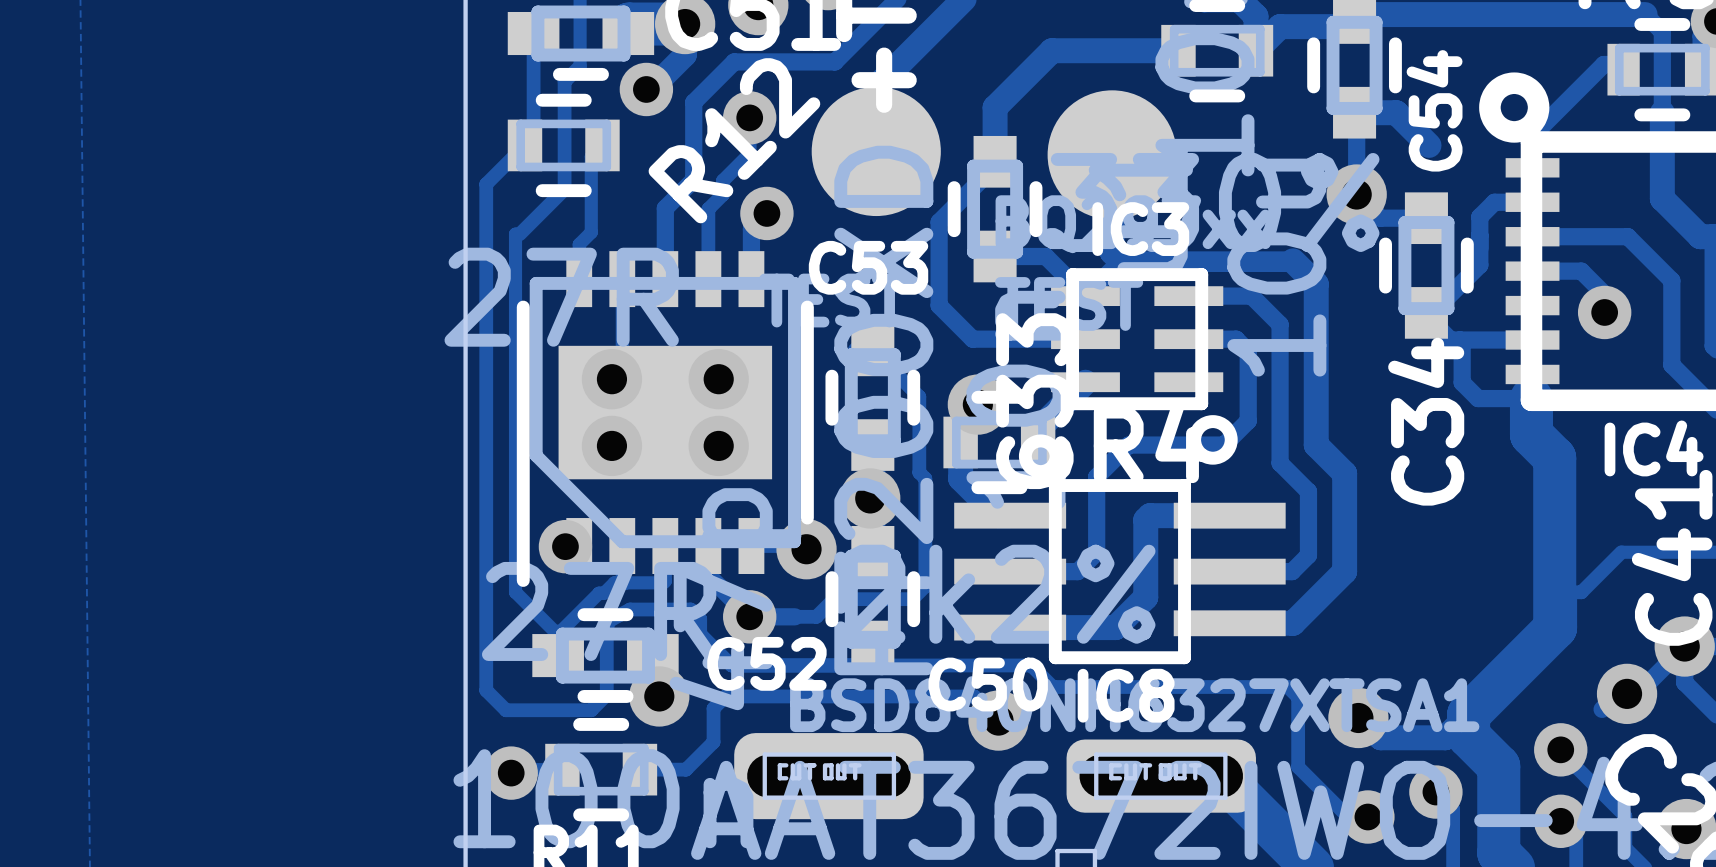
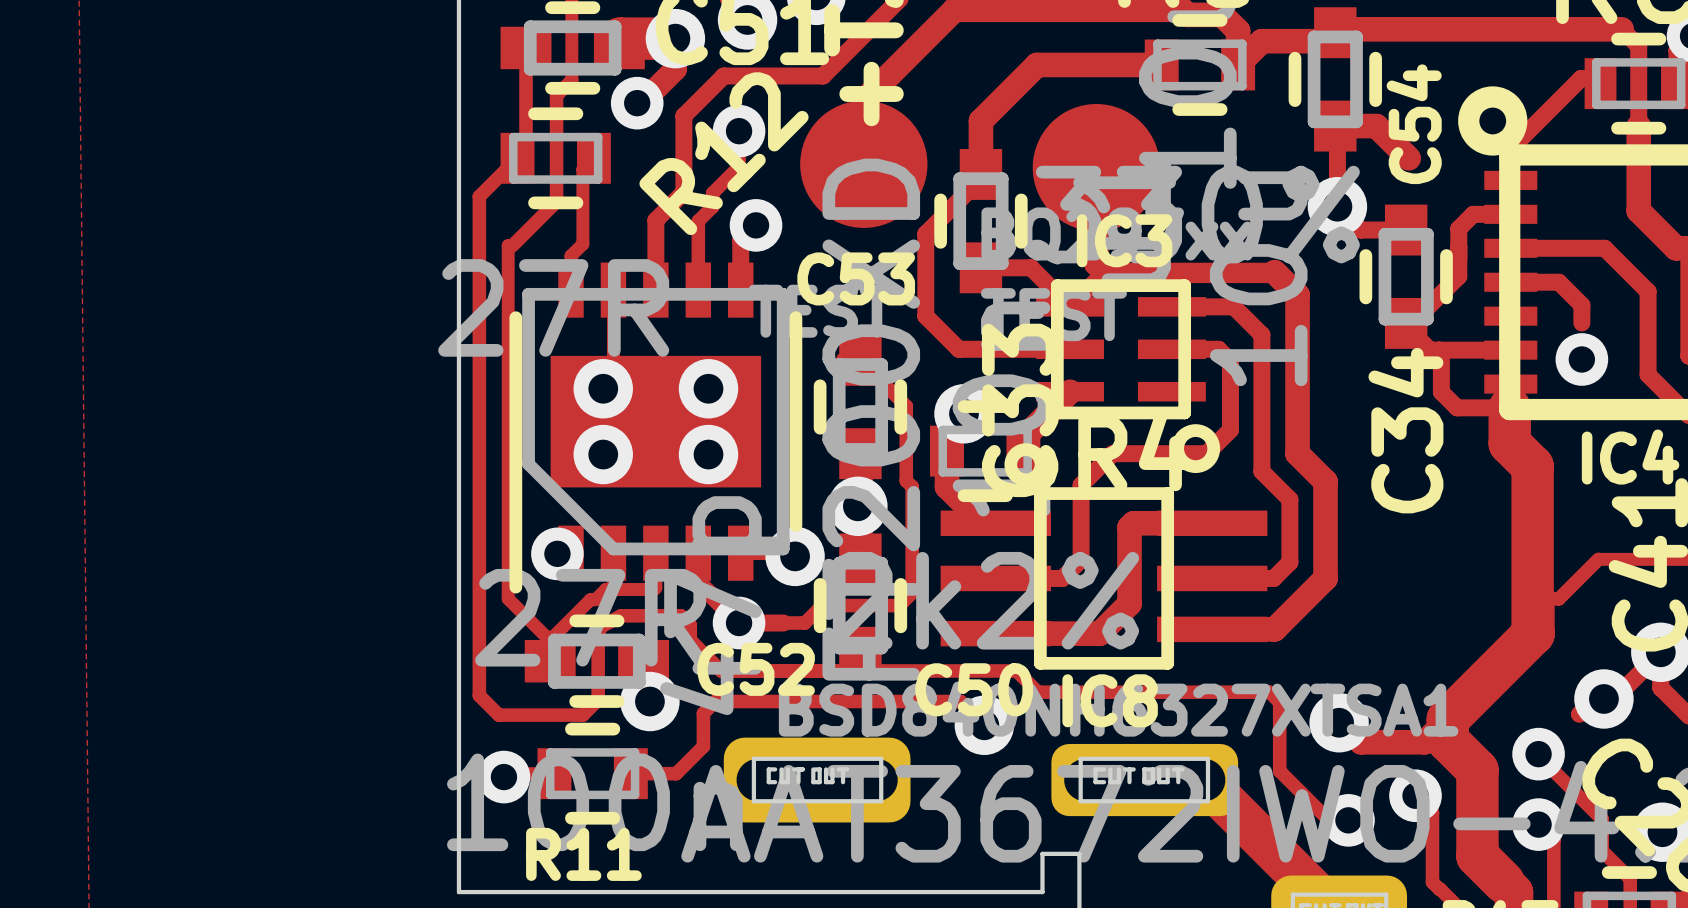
via position: (1604, 312) -> (1581, 359)

